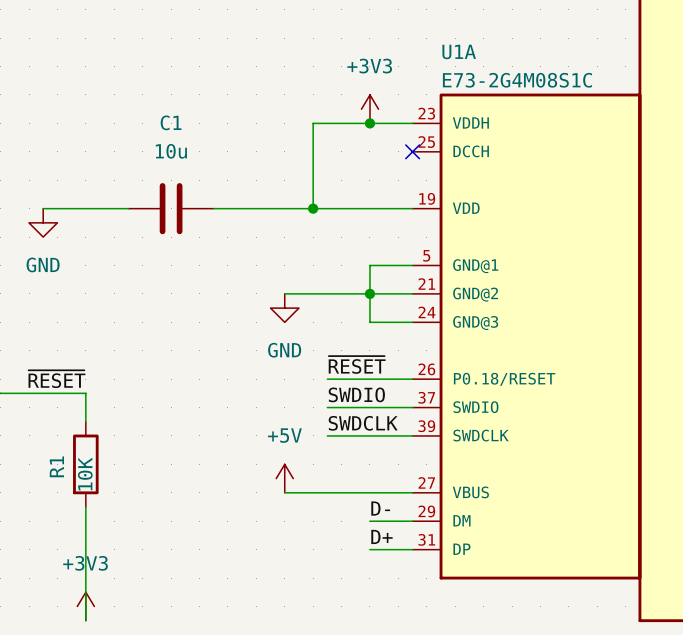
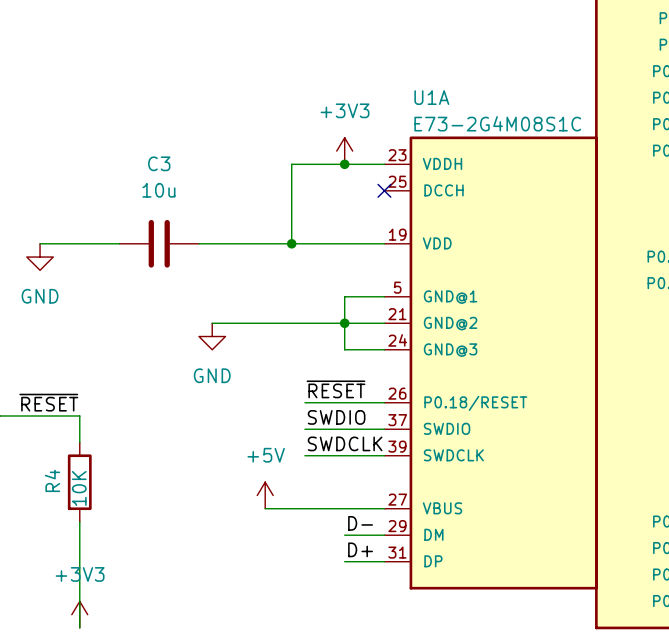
C1 name: C1 (171, 122) -> C3 (159, 163)
wire: none -> (212, 323) (265, 323)
power symbol position: GND (284, 308) -> GND (212, 336)
R1 name: R1 (56, 466) -> R4 (52, 480)

